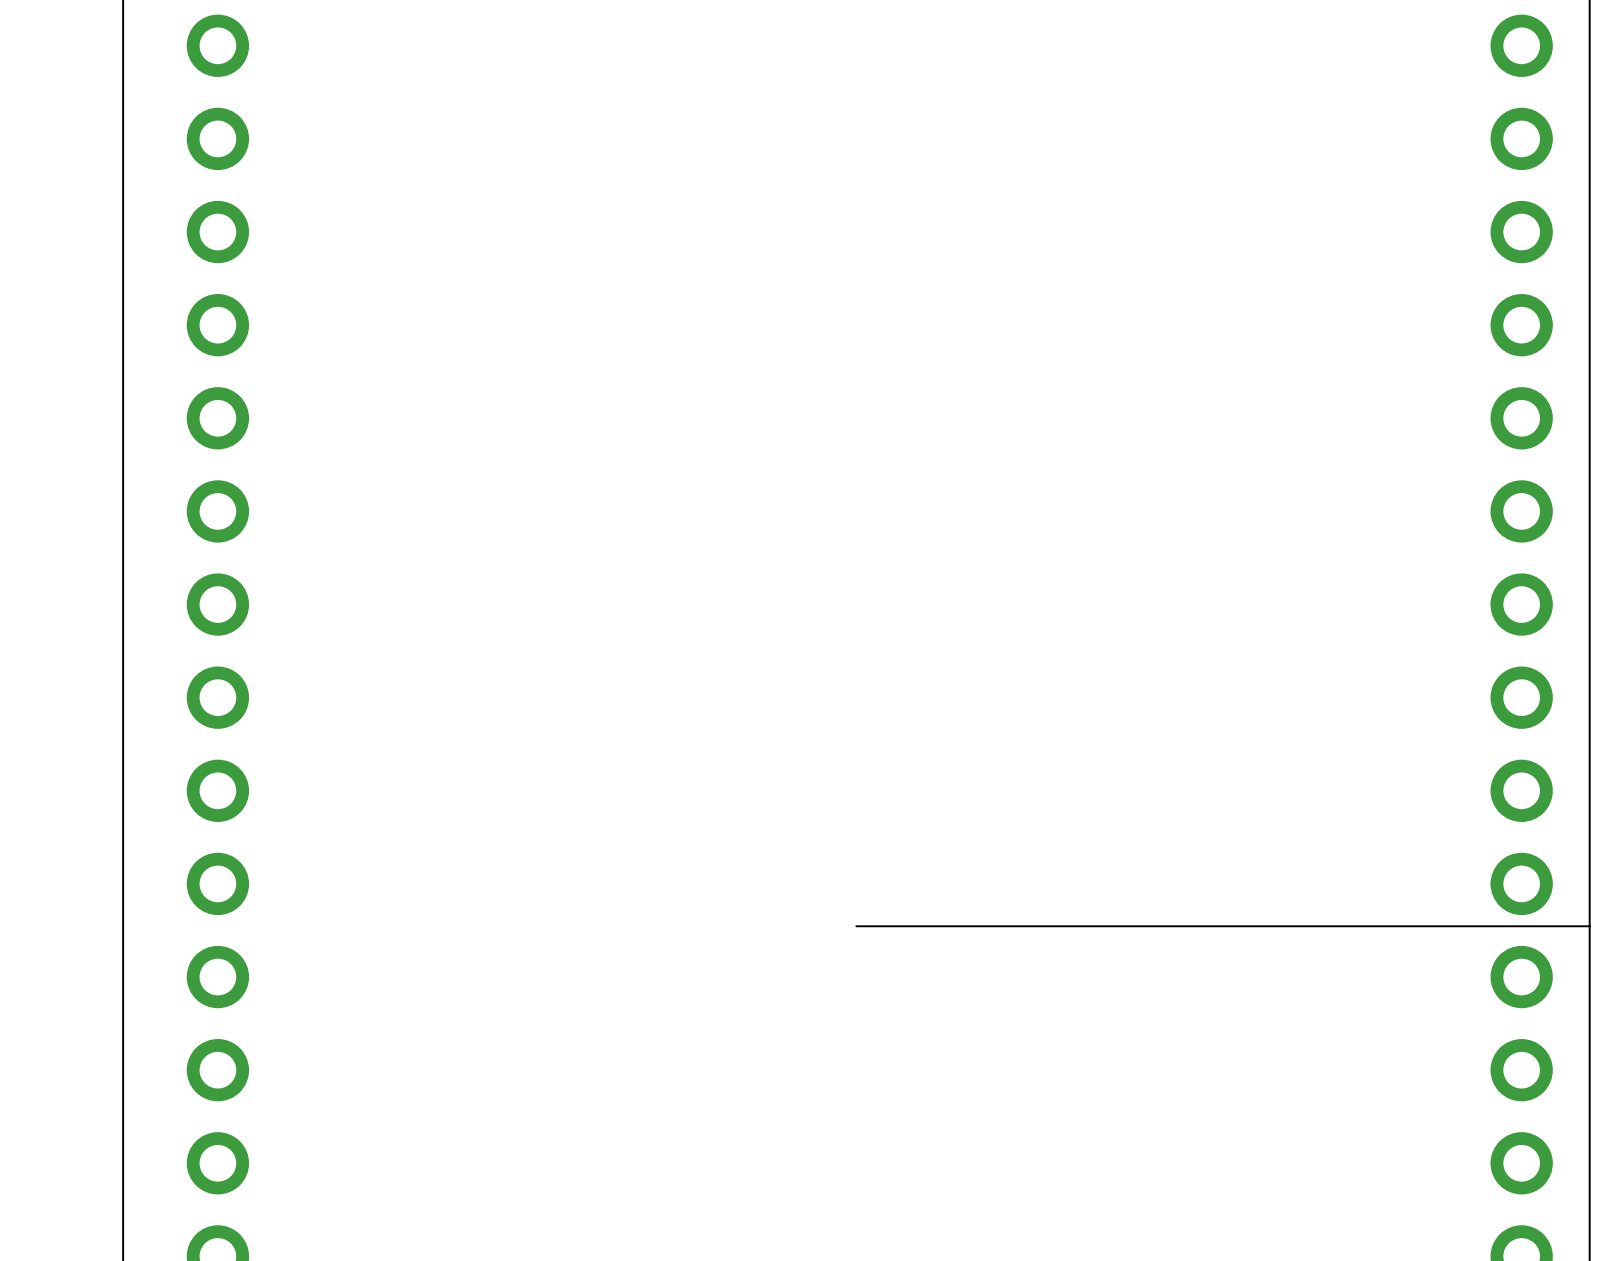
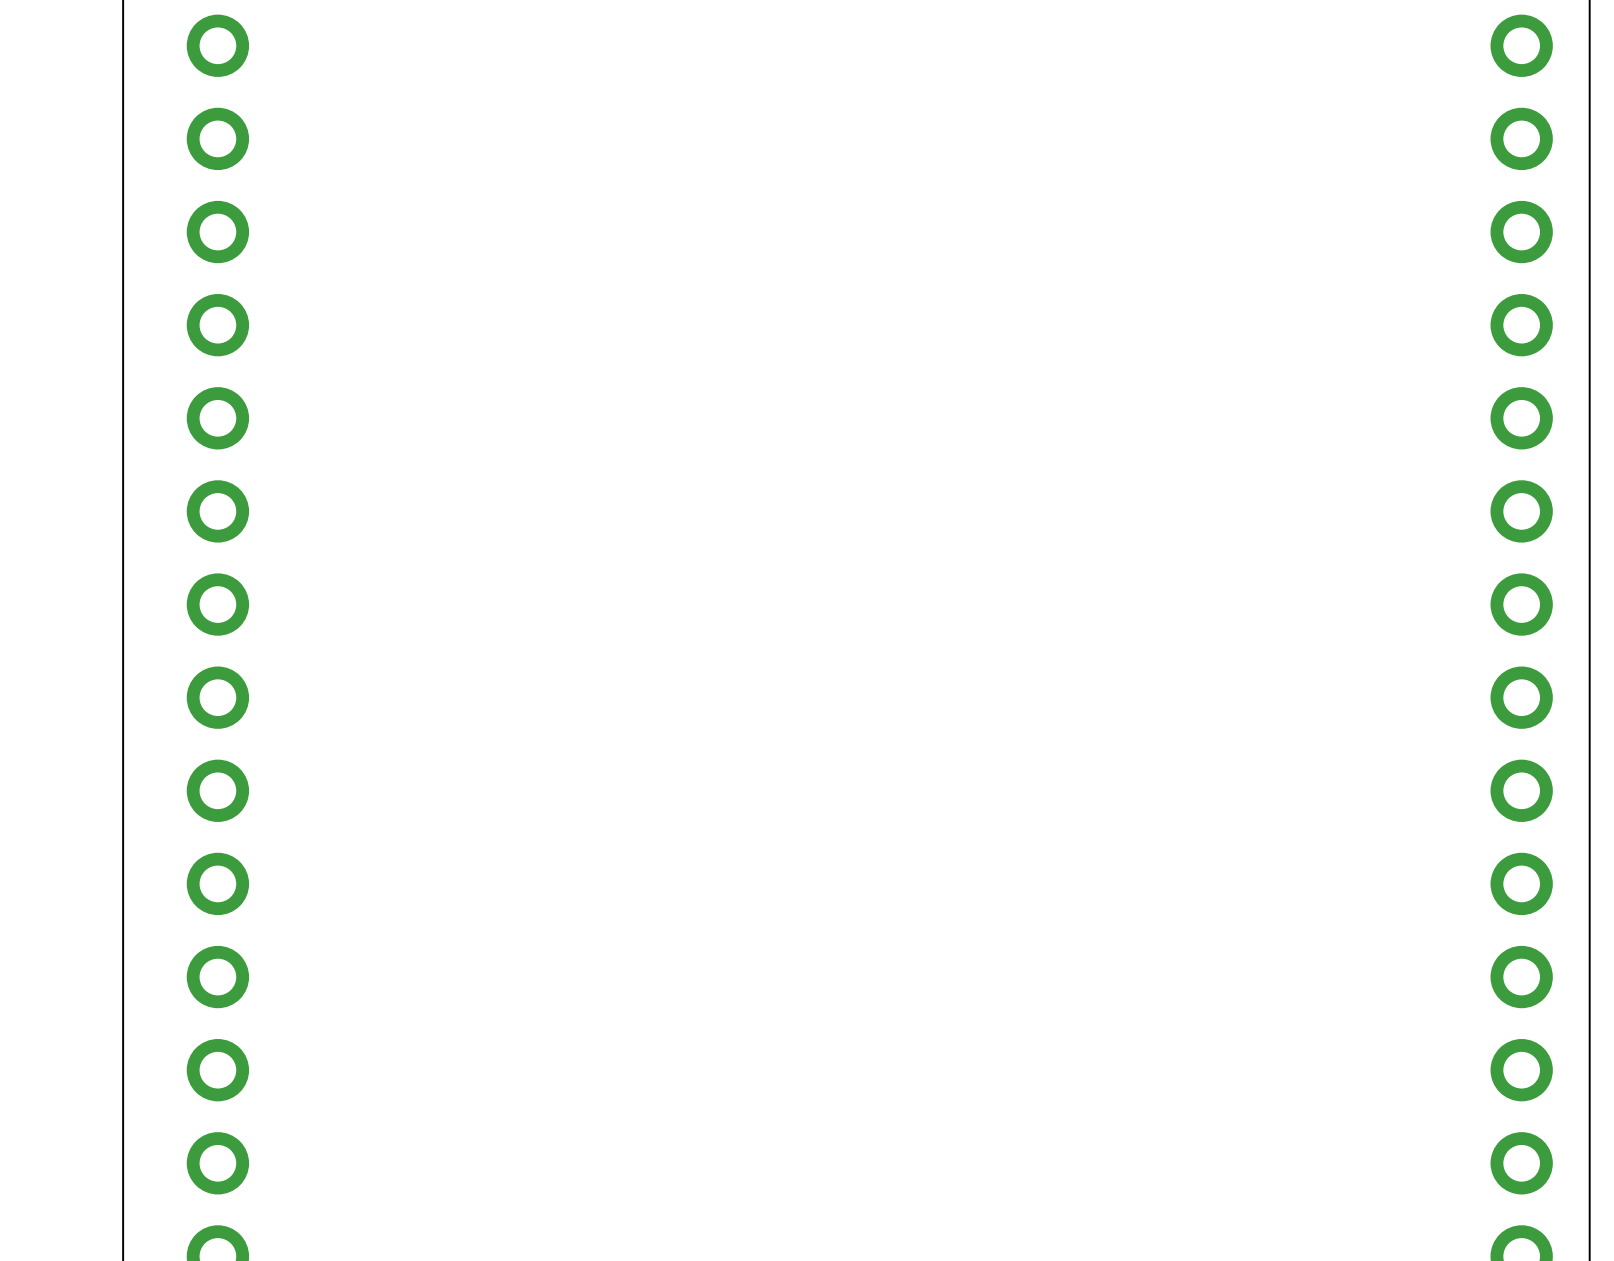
board edge: (1589, 926) (856, 926) -> none

